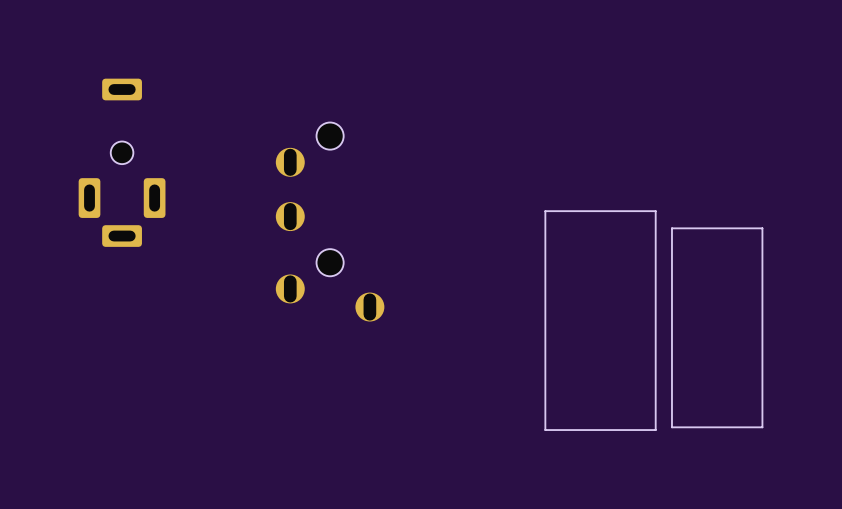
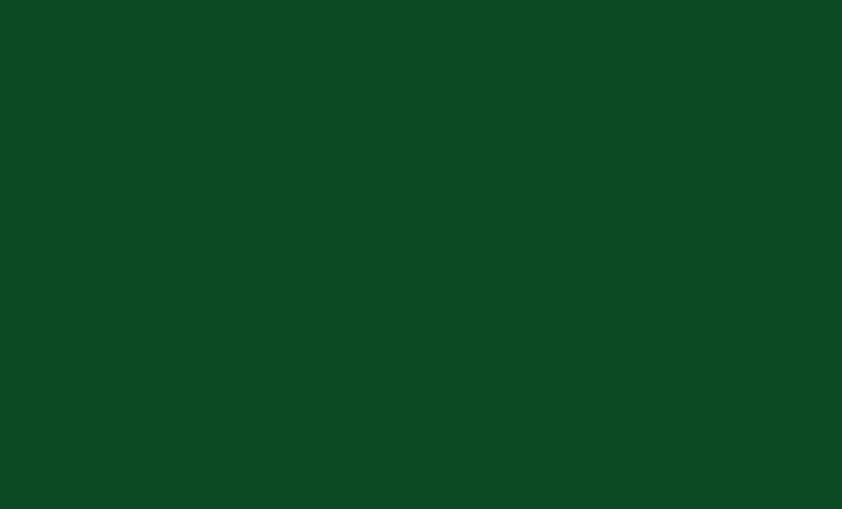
part: (122, 162) -> none
board edge: (655, 211) (545, 211) (545, 430) (655, 430) (655, 211) -> none
part: (330, 222) -> none
board edge: (762, 228) (671, 228) (671, 427) (762, 427) (762, 228) -> none

